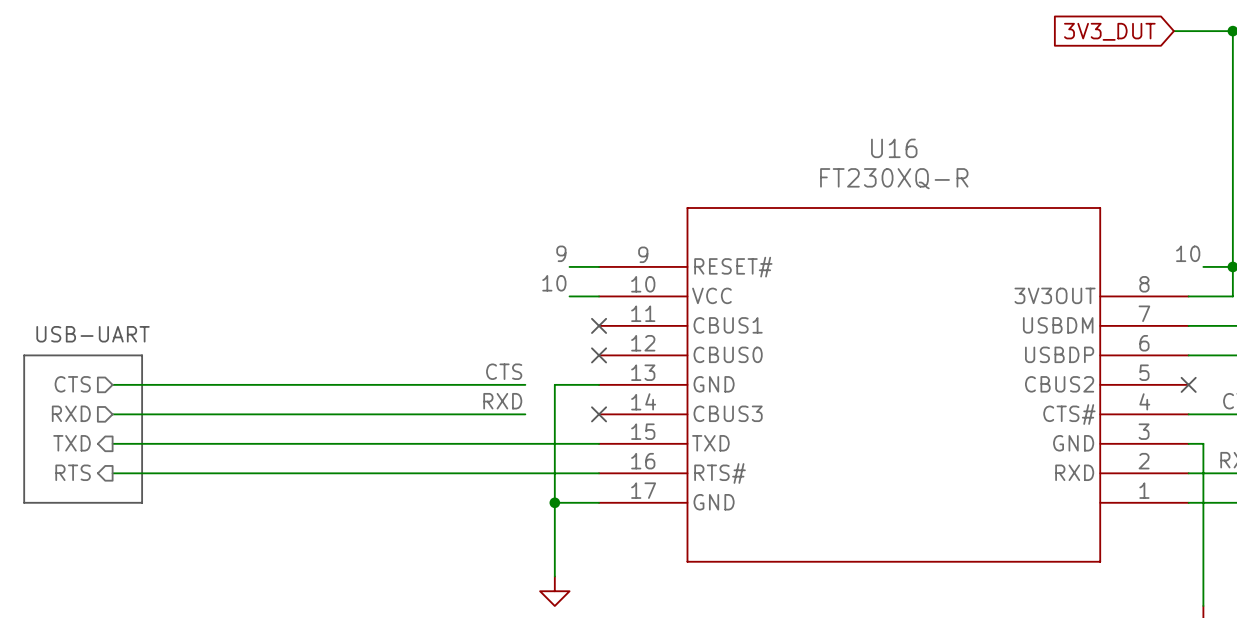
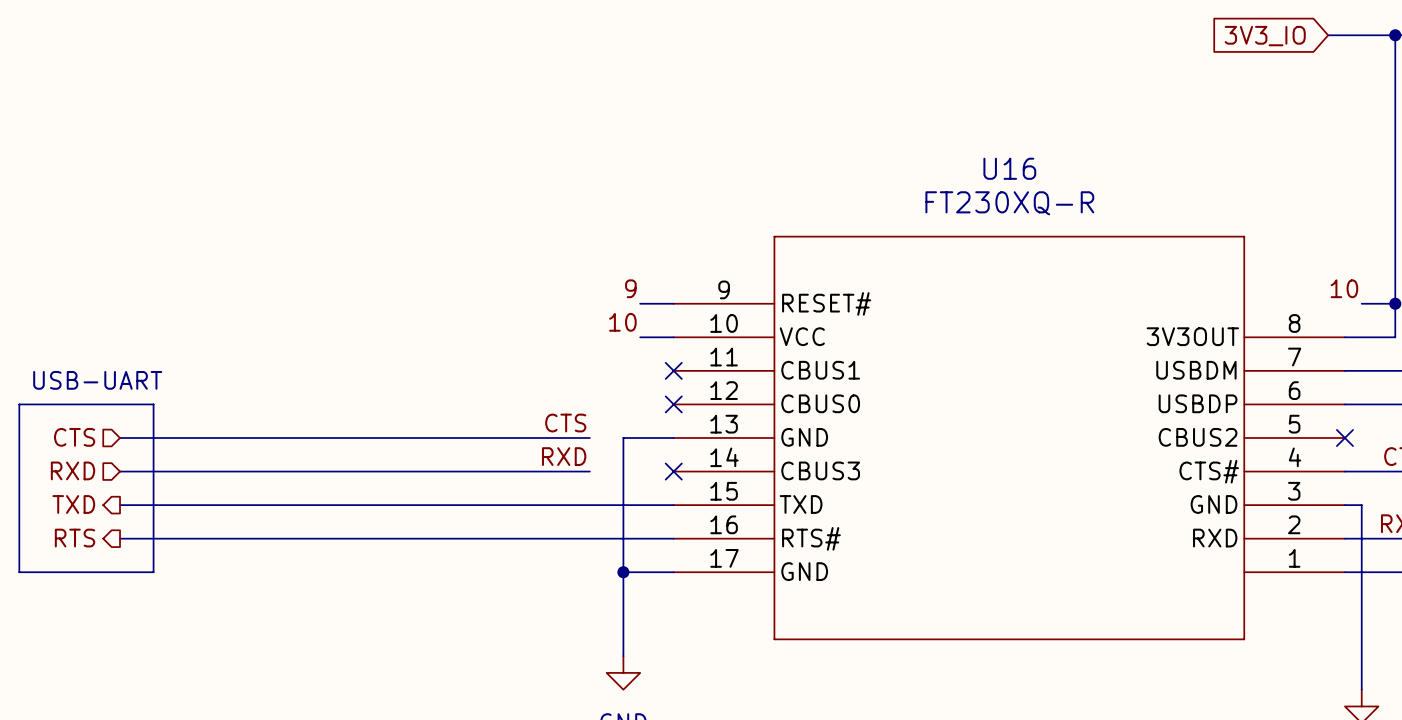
global label: 3V3_DUT (1109, 31) -> 3V3_IO (1265, 36)

